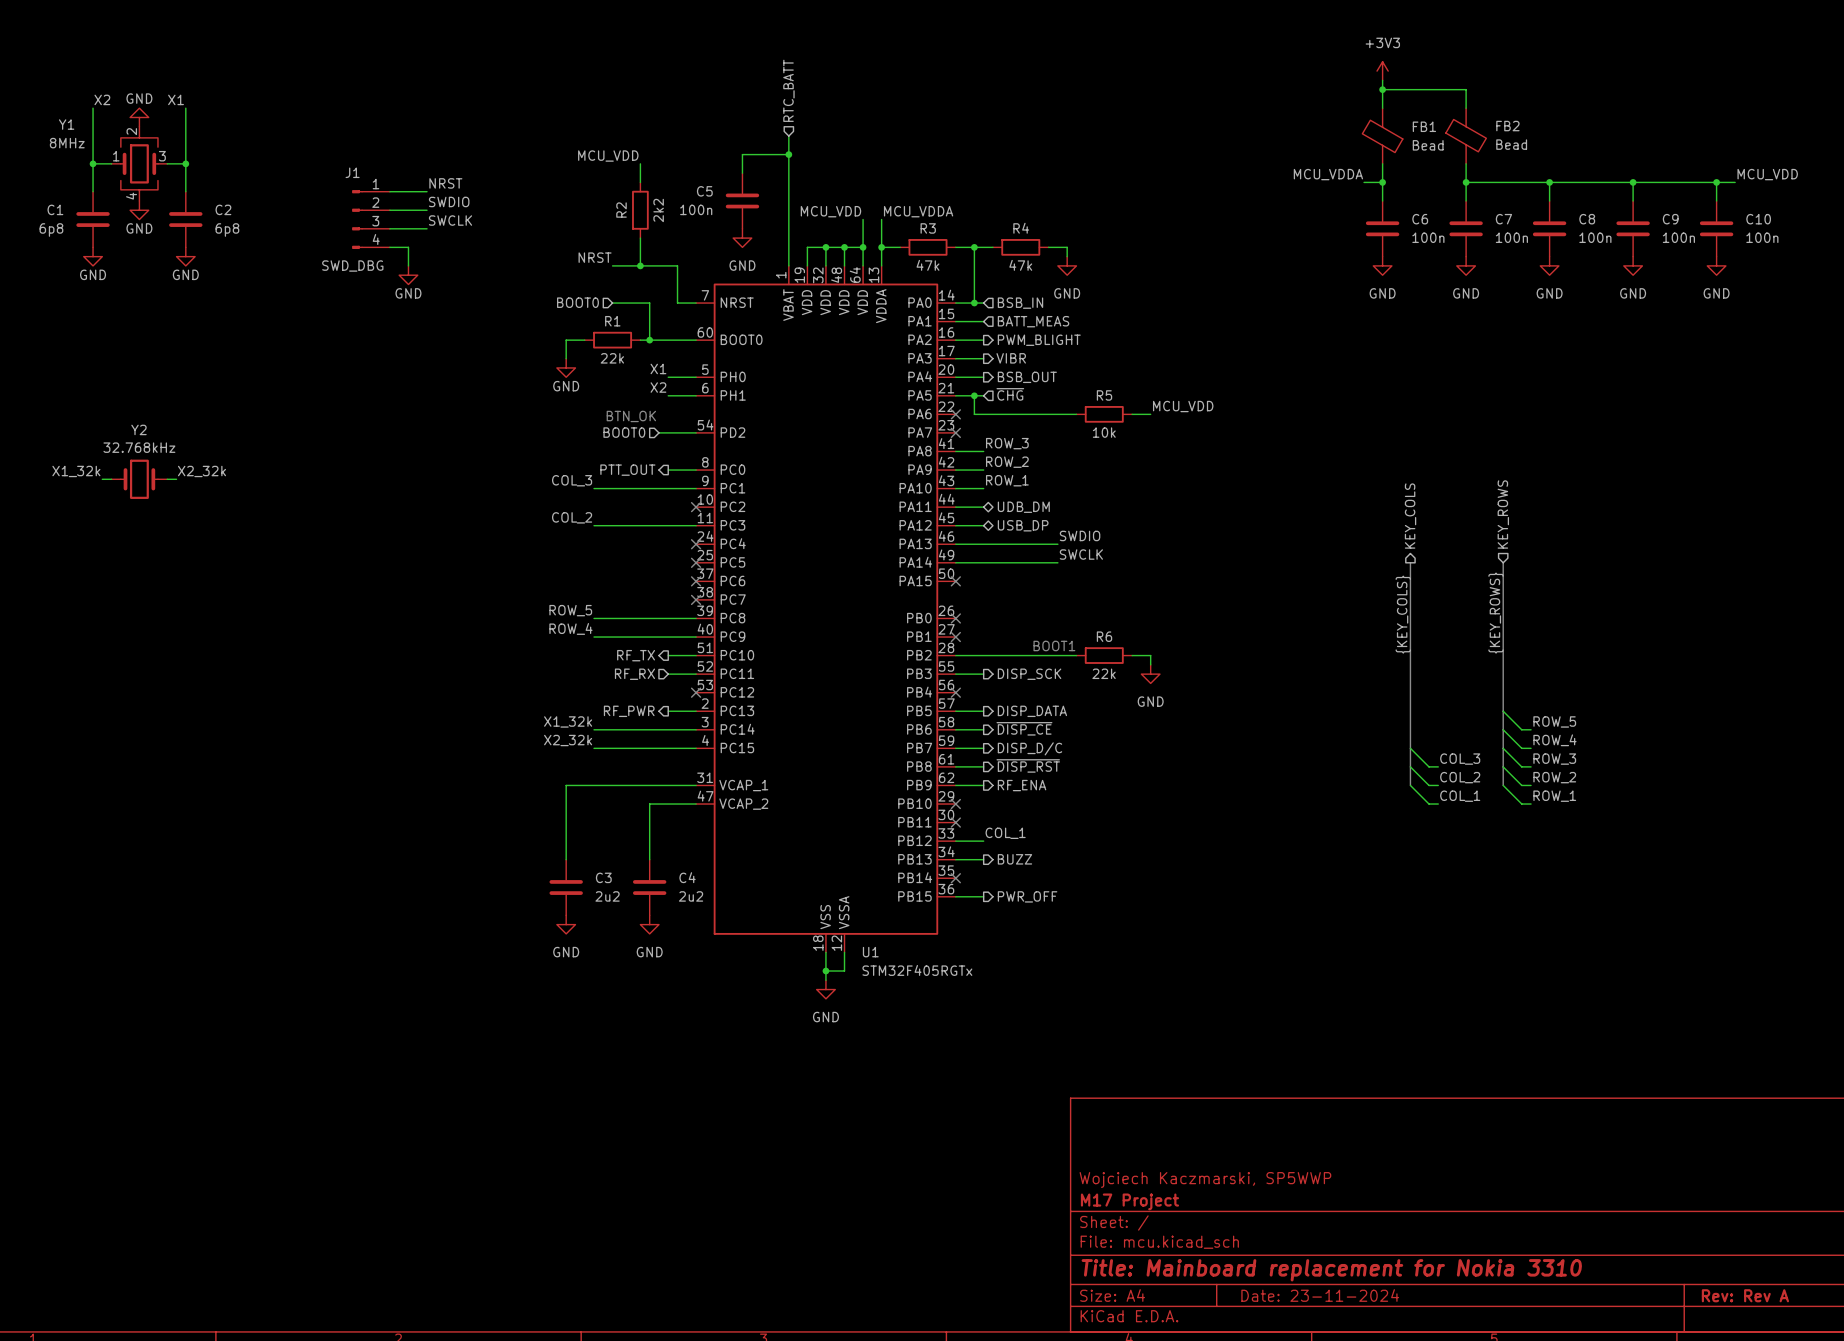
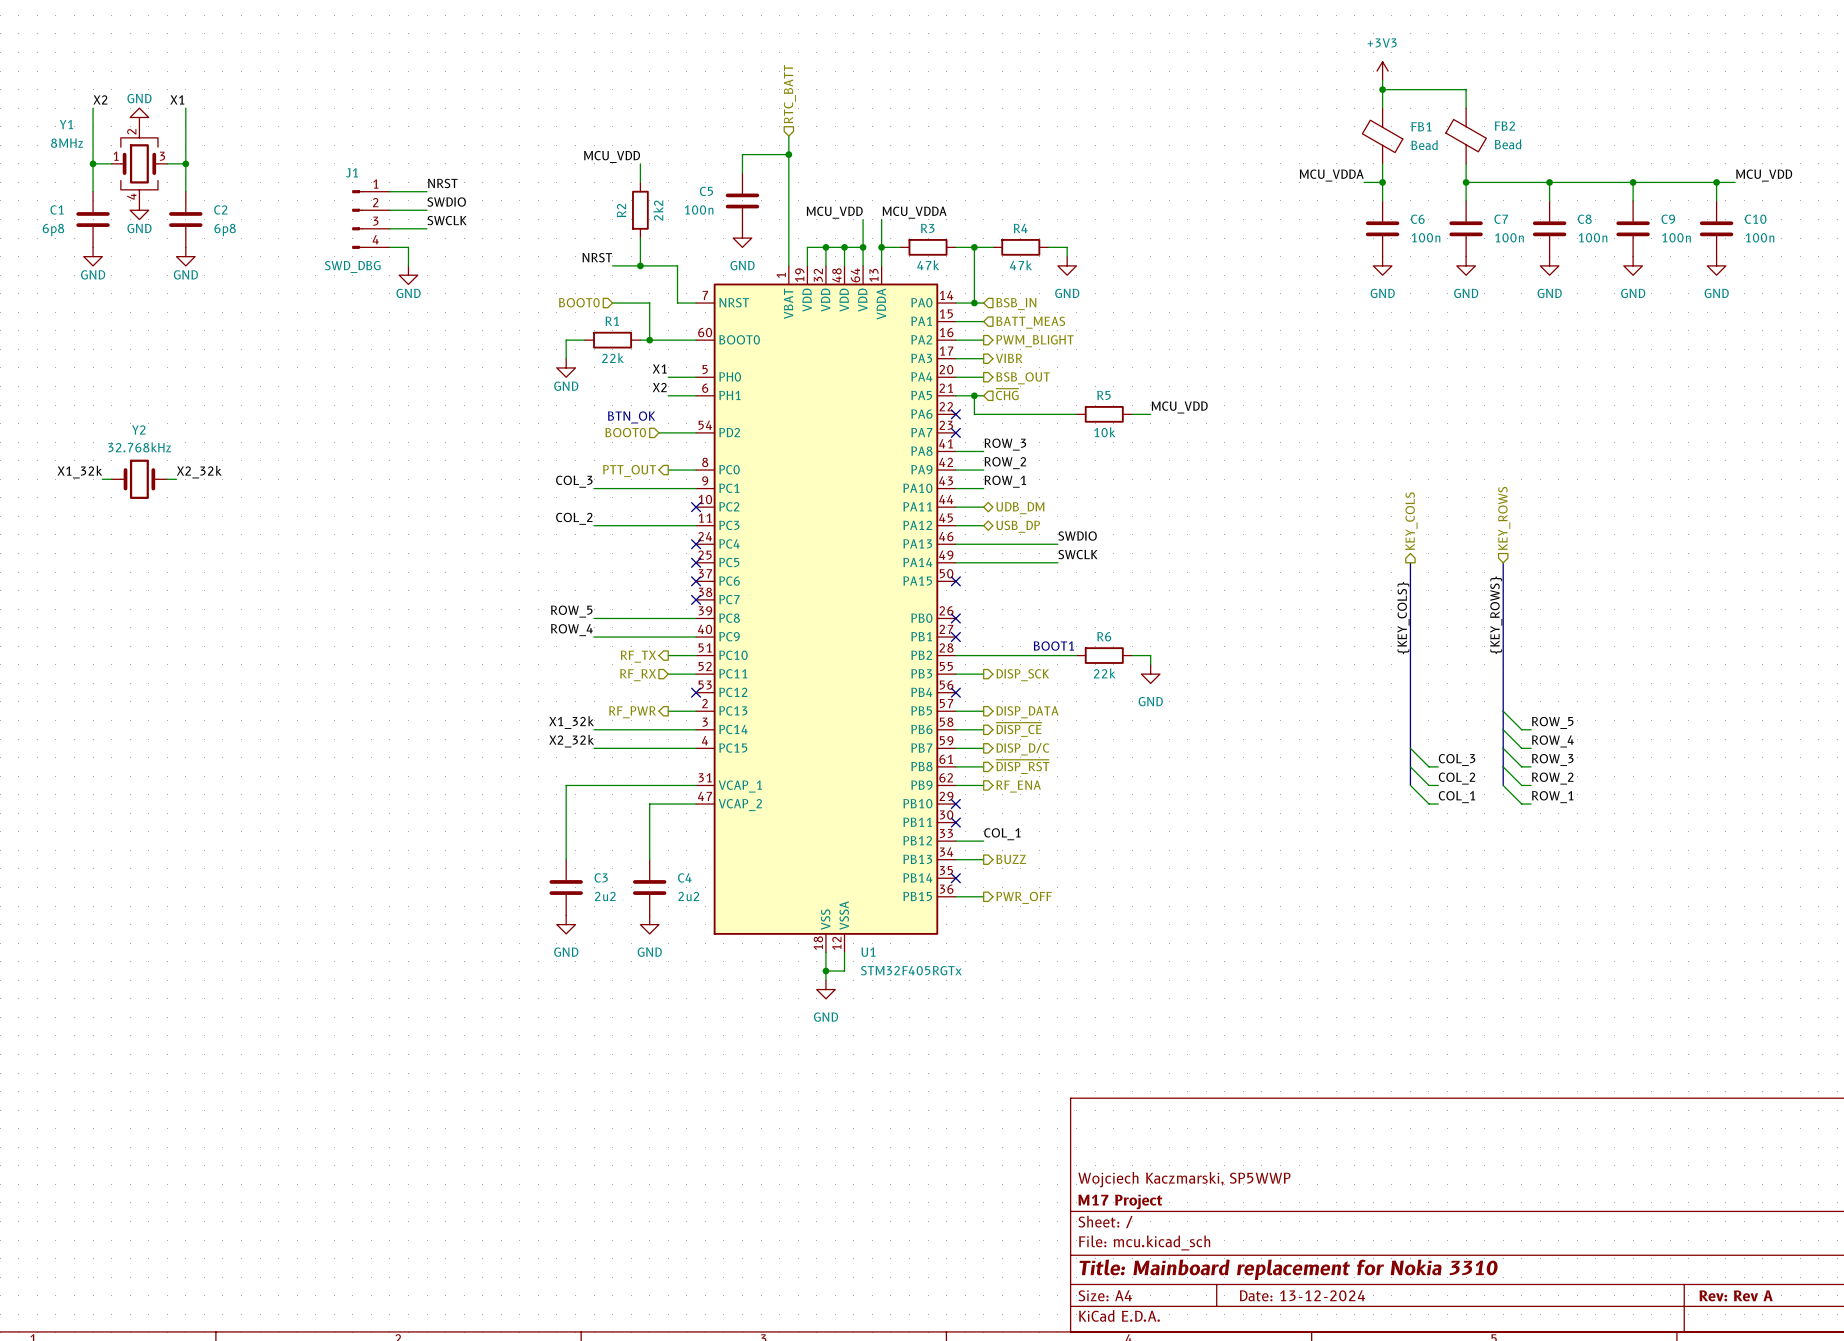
title block: Date: 23-11-2024 (1320, 1295) -> Date: 13-12-2024 (1302, 1295)

